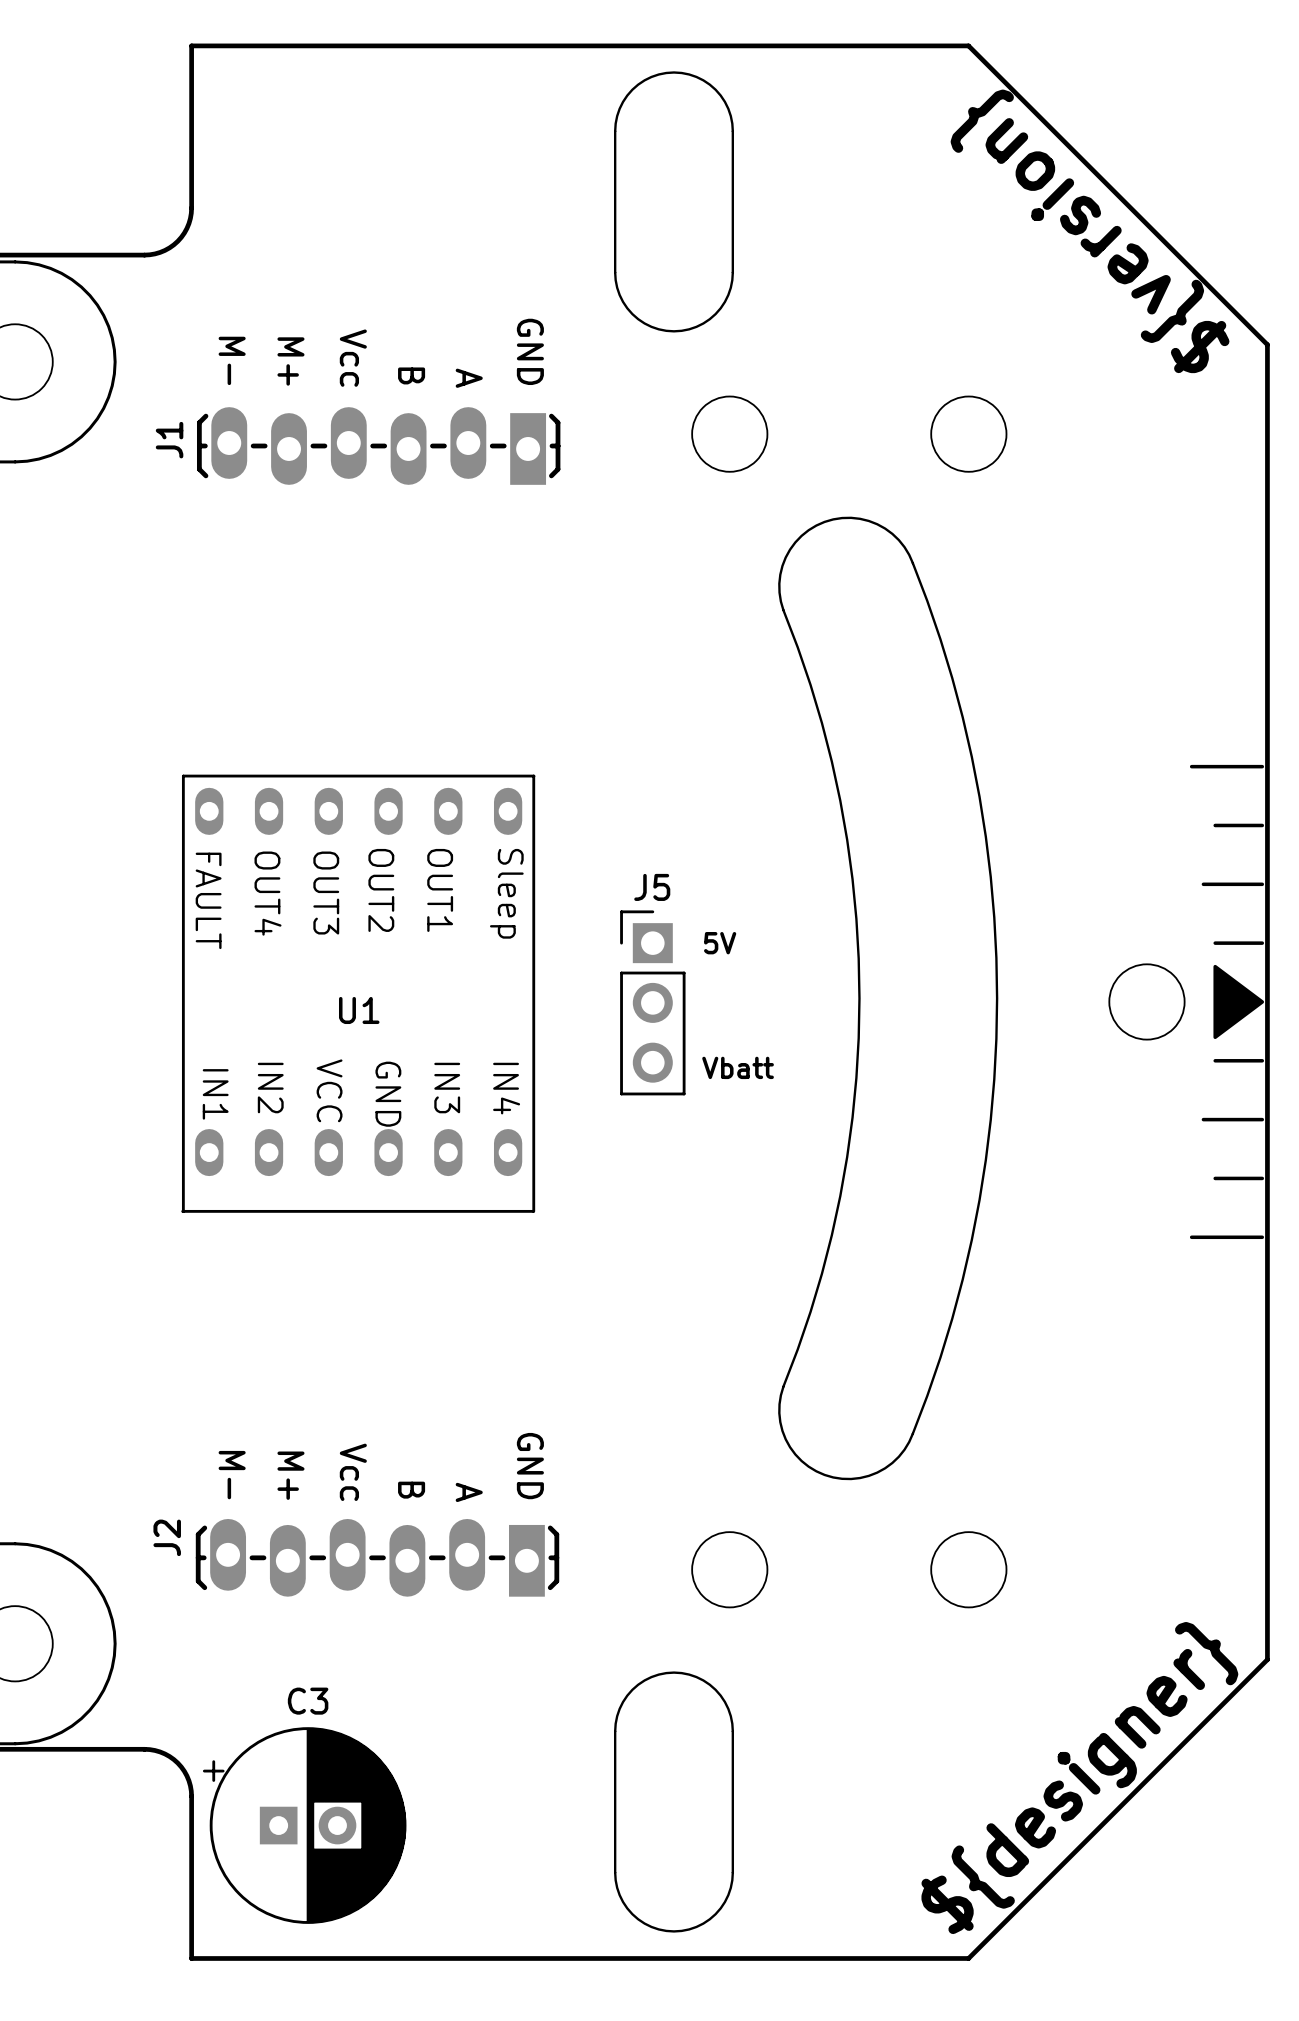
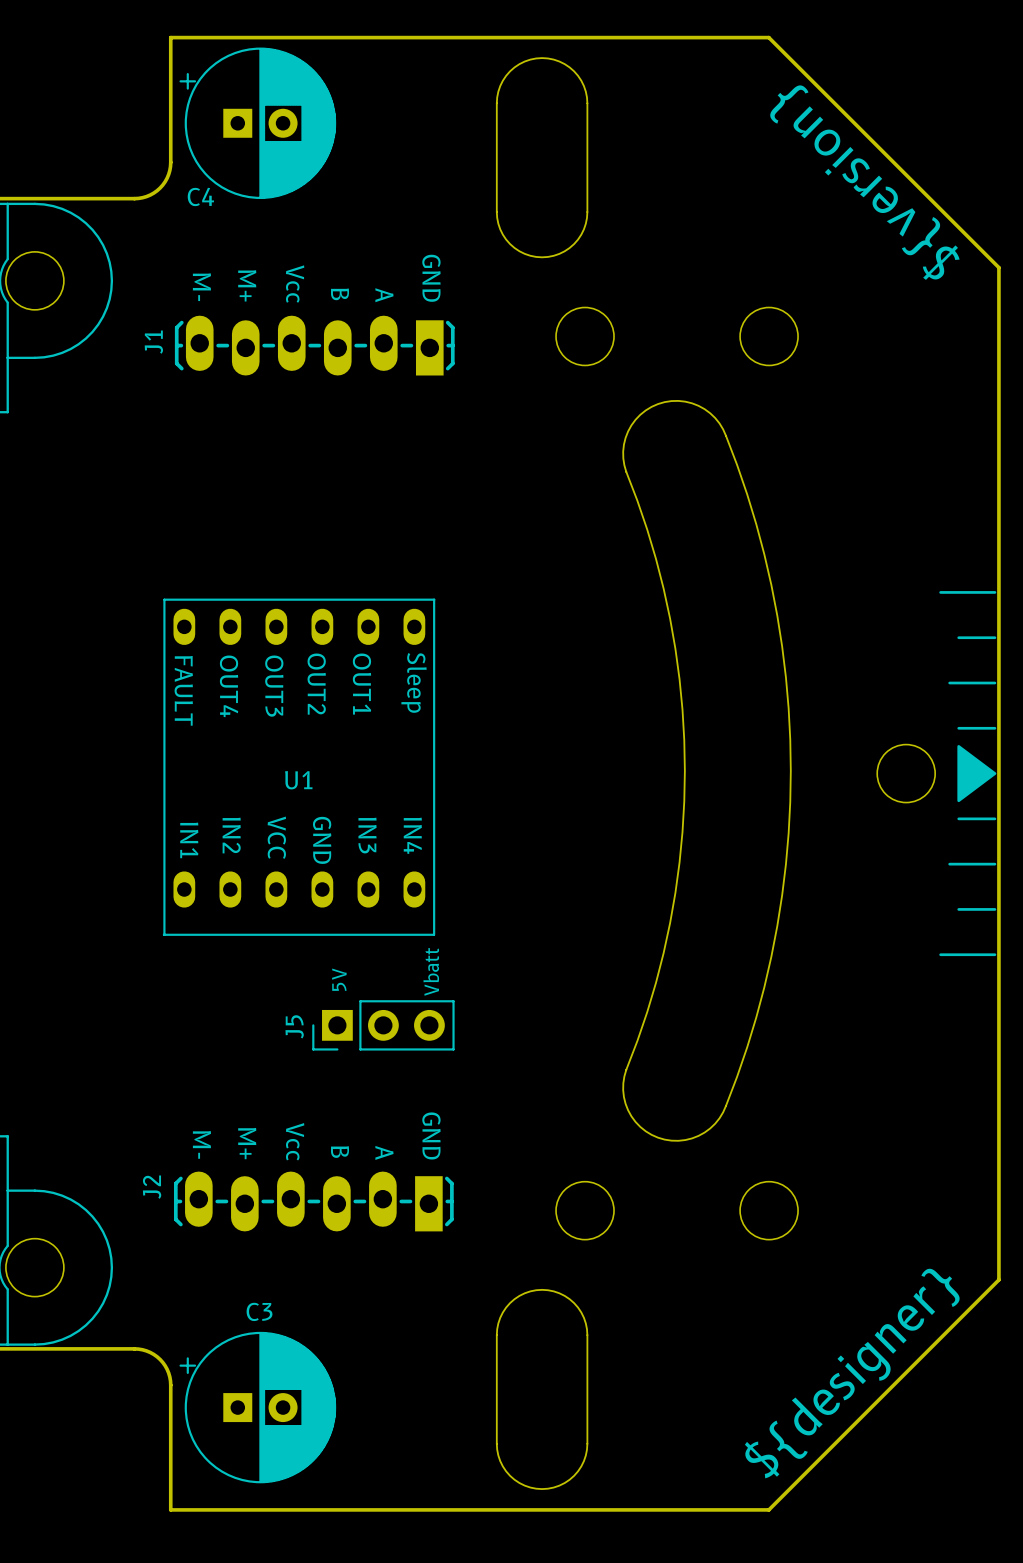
C4: none -> (257, 123)
text rotation: 0° (720, 943) -> 90° counterclockwise (339, 979)
text position: 5V (720, 943) -> 5V (339, 979)
J5 rotation: 0° (652, 1002) -> 90° counterclockwise (383, 1025)
J5 position: (652, 1002) -> (383, 1025)
text rotation: 0° (738, 1067) -> 90° counterclockwise (431, 971)
text position: Vbatt (738, 1067) -> Vbatt (431, 971)

